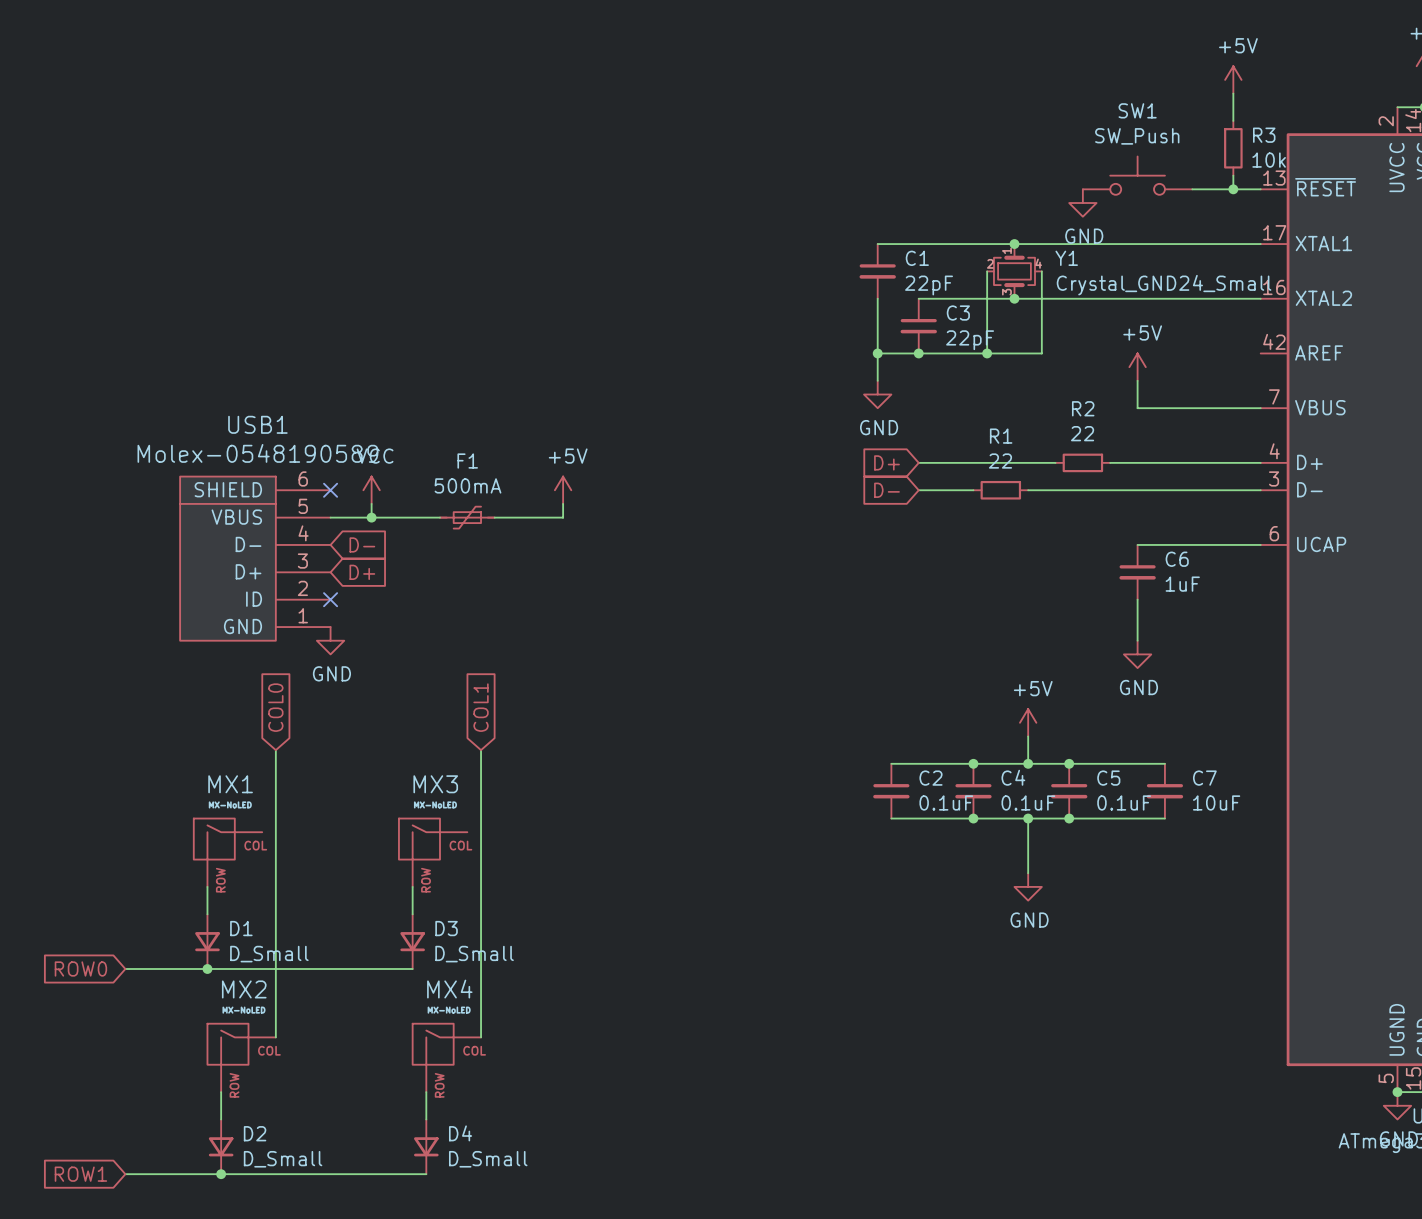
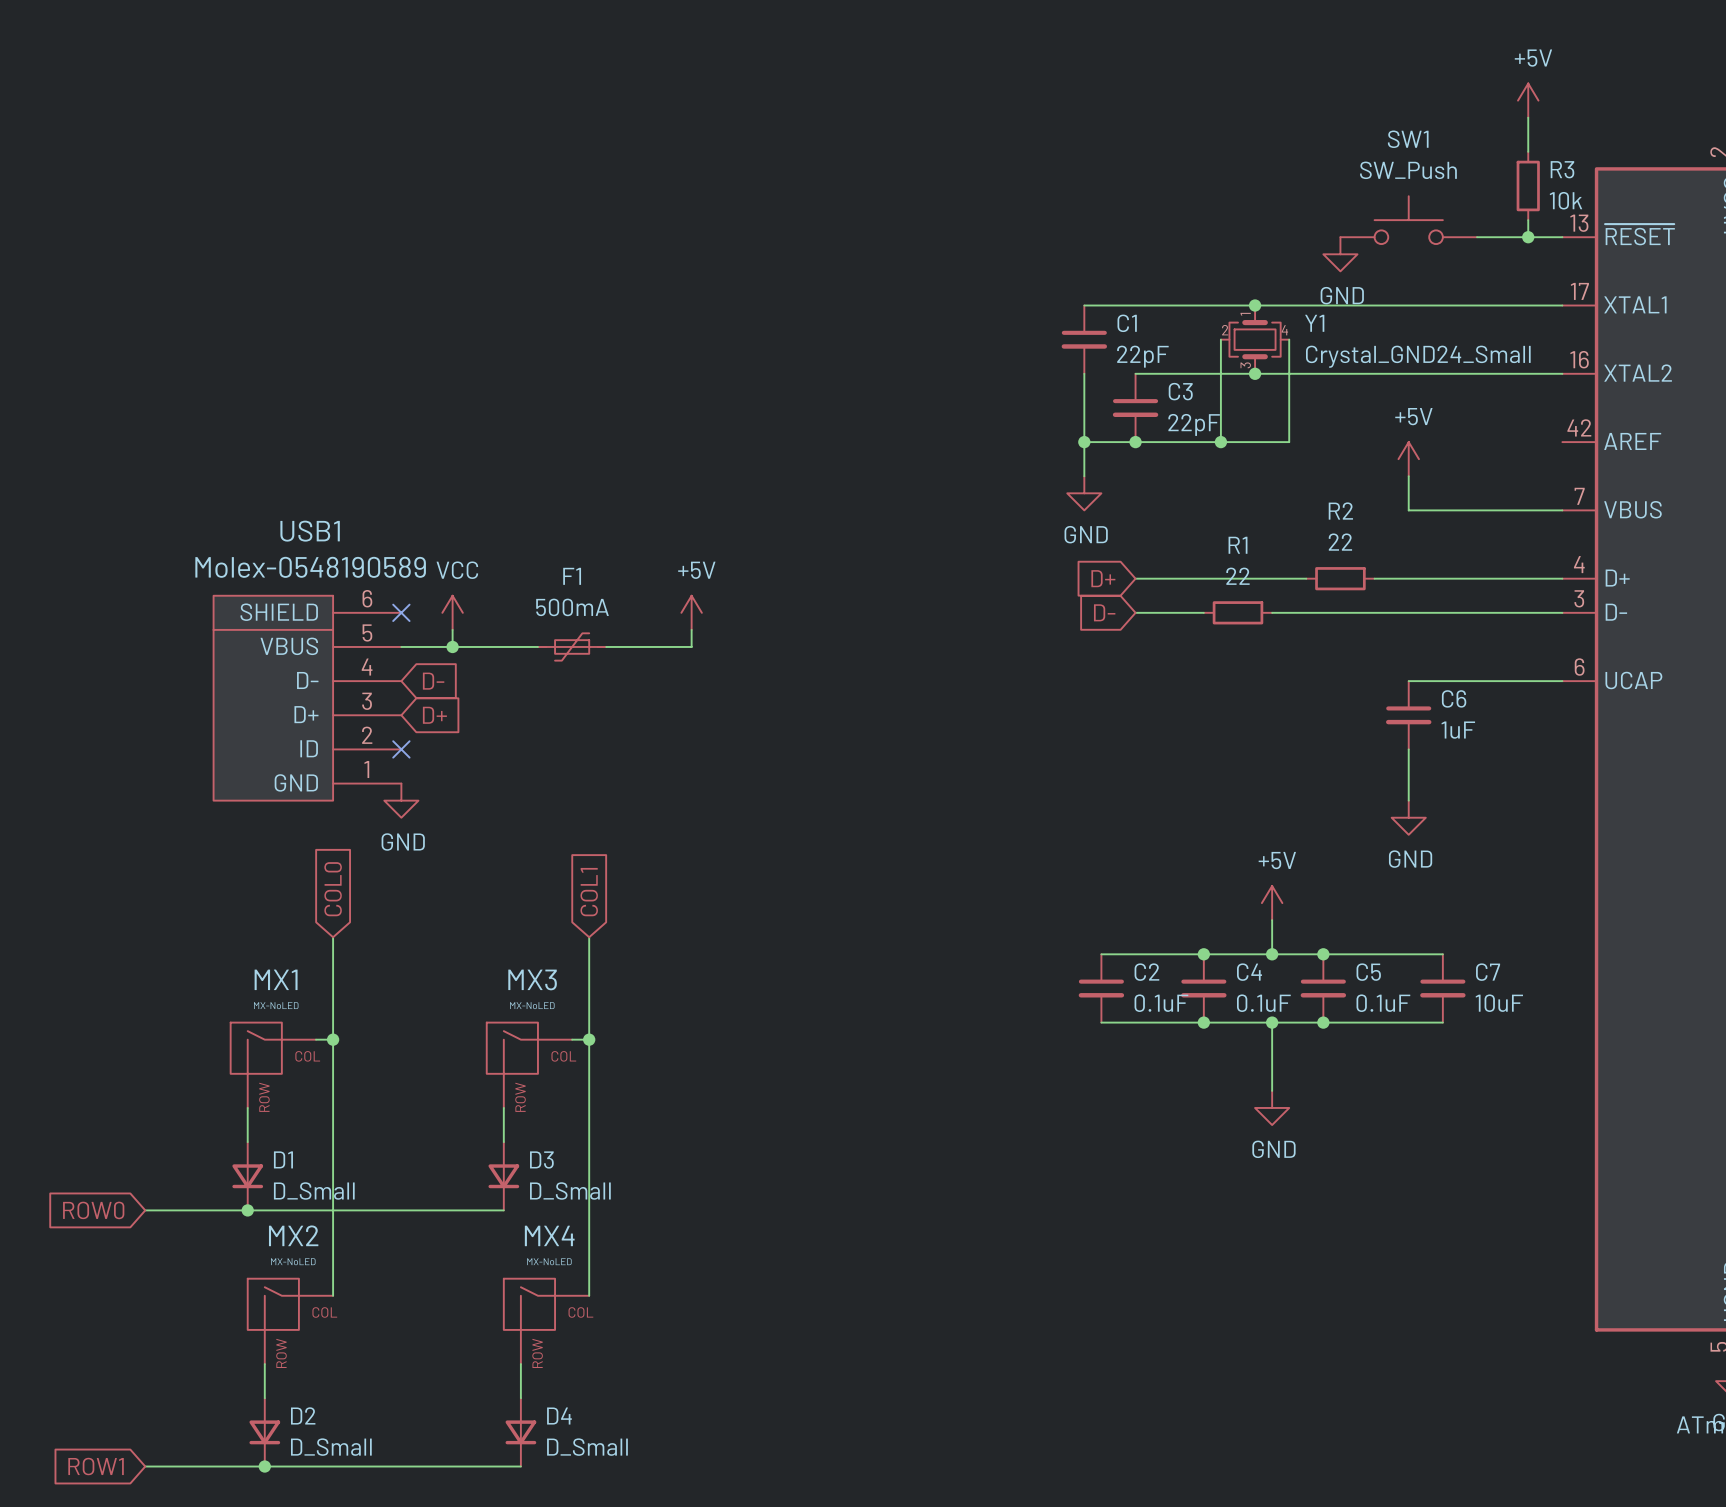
wire: none -> (316, 1039) (333, 1039)
junction: none -> (333, 1039)
wire: none -> (572, 1039) (589, 1039)
junction: none -> (589, 1039)

